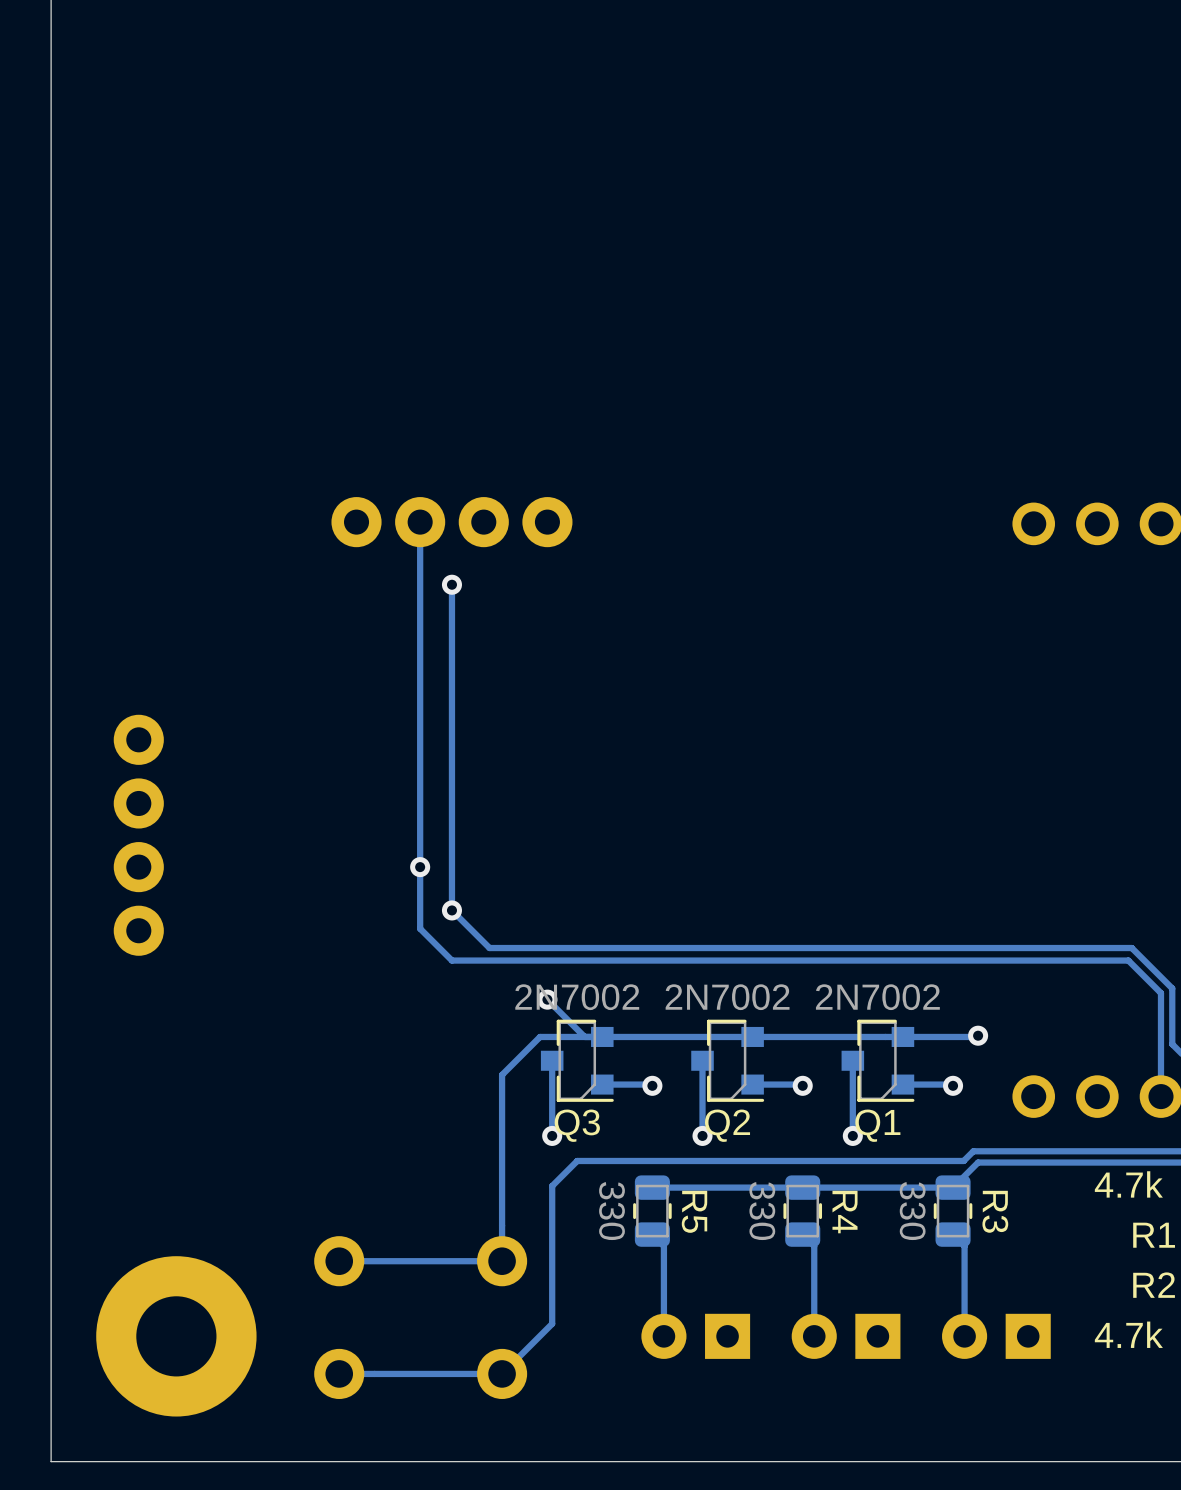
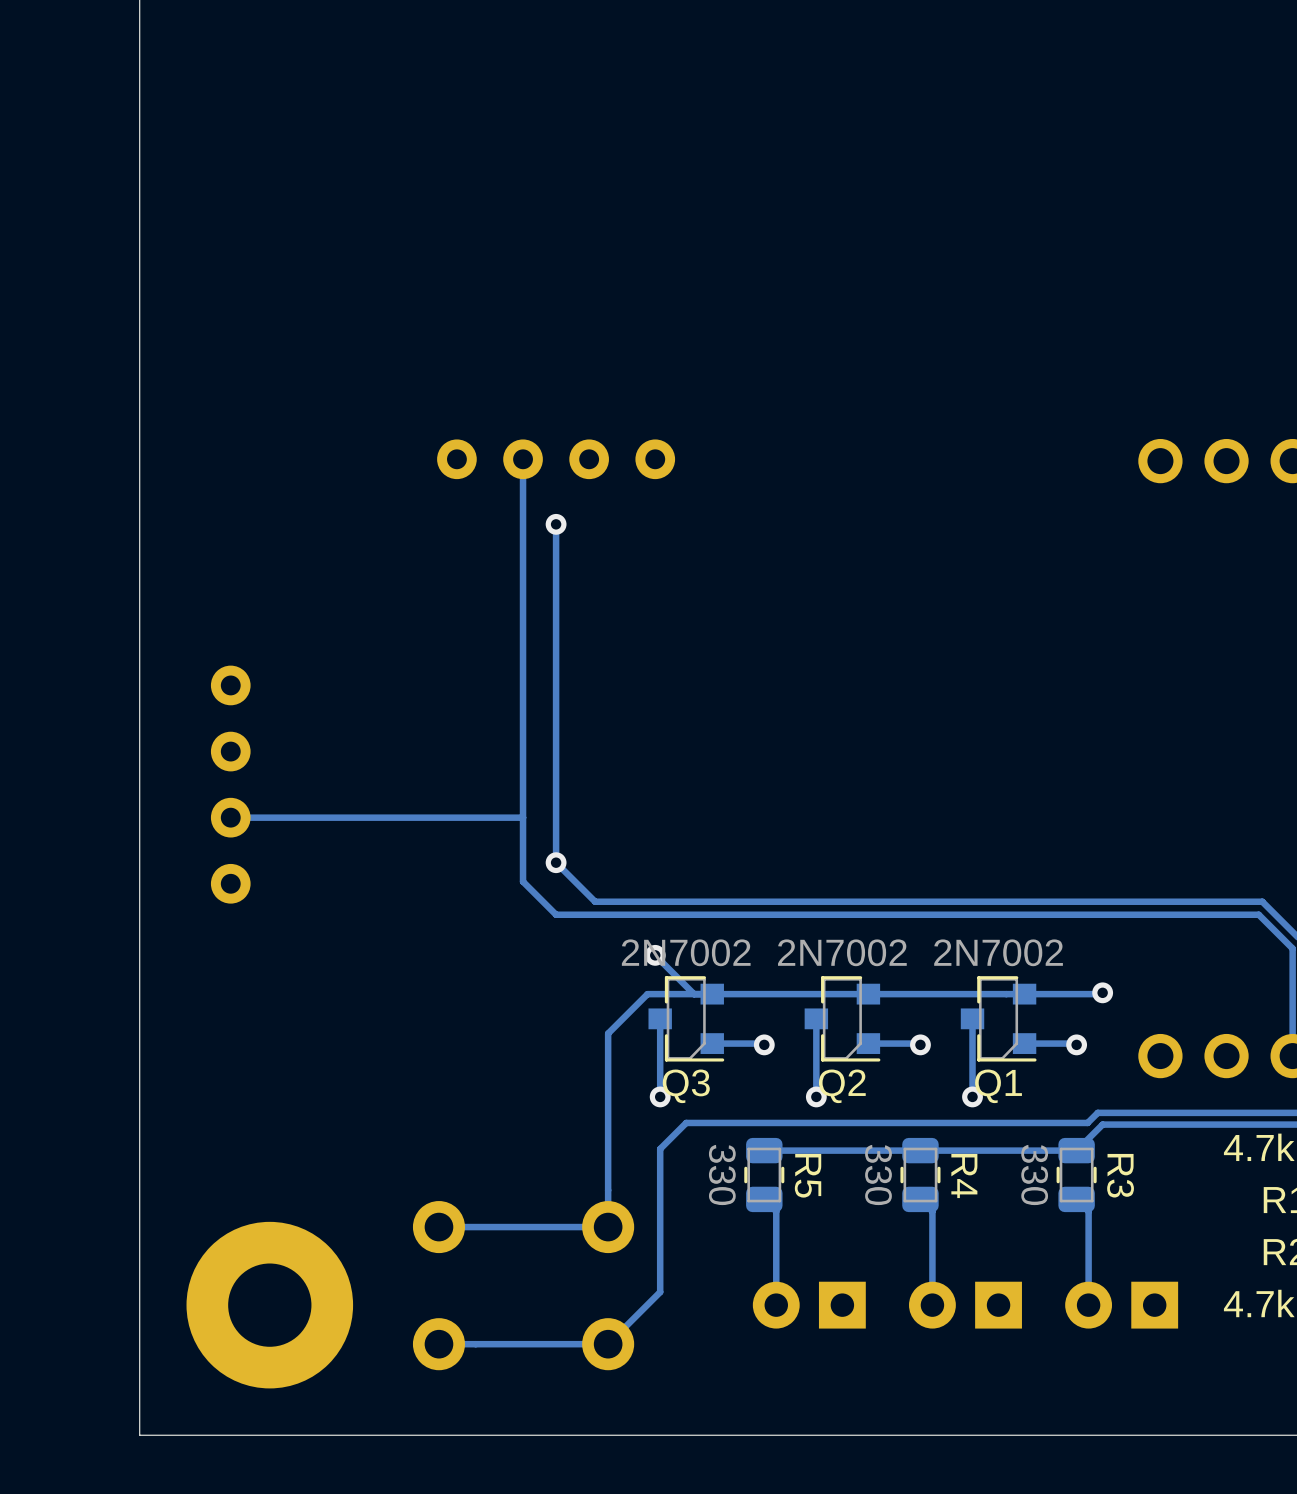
part footprint: [331, 497, 573, 548] -> [437, 439, 676, 480]
part footprint: [113, 714, 164, 956] -> [210, 665, 251, 904]
track: none -> (523, 817) (230, 817)
via: (420, 867) -> none

